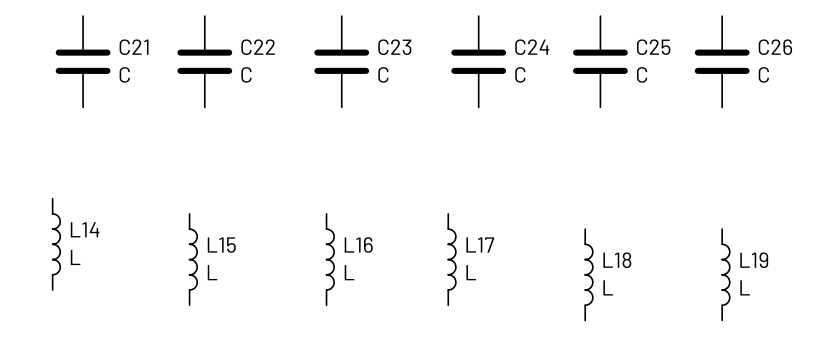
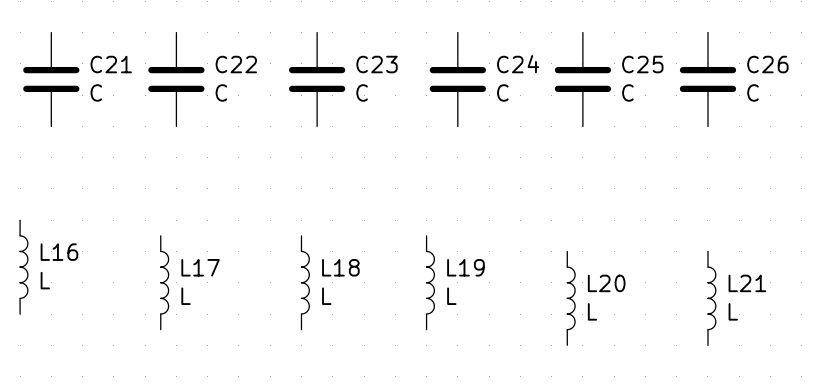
L14 name: L14 (85, 229) -> L16 (59, 252)
L16 name: L16 (358, 244) -> L18 (340, 267)
L15 name: L15 (221, 245) -> L17 (200, 267)
L17 name: L17 (480, 245) -> L19 (465, 267)
L18 name: L18 (617, 260) -> L20 (606, 283)
L19 name: L19 (754, 260) -> L21 (747, 283)

